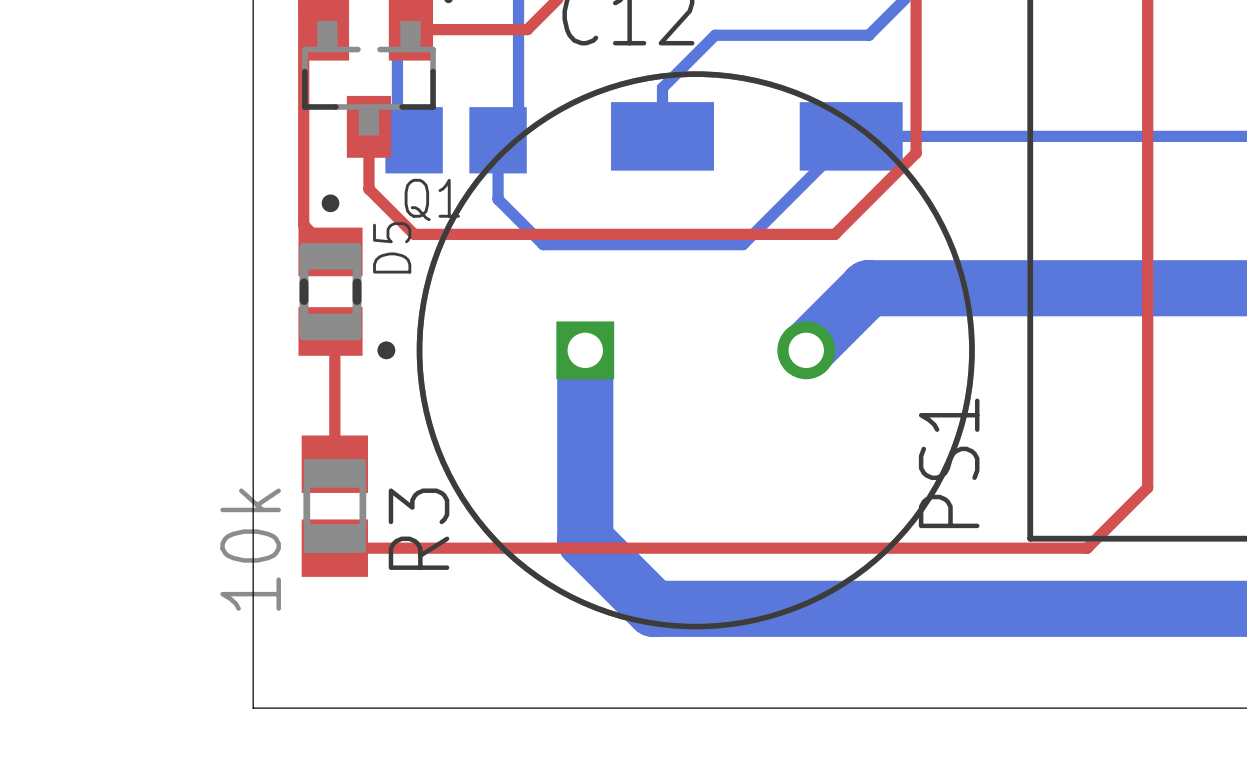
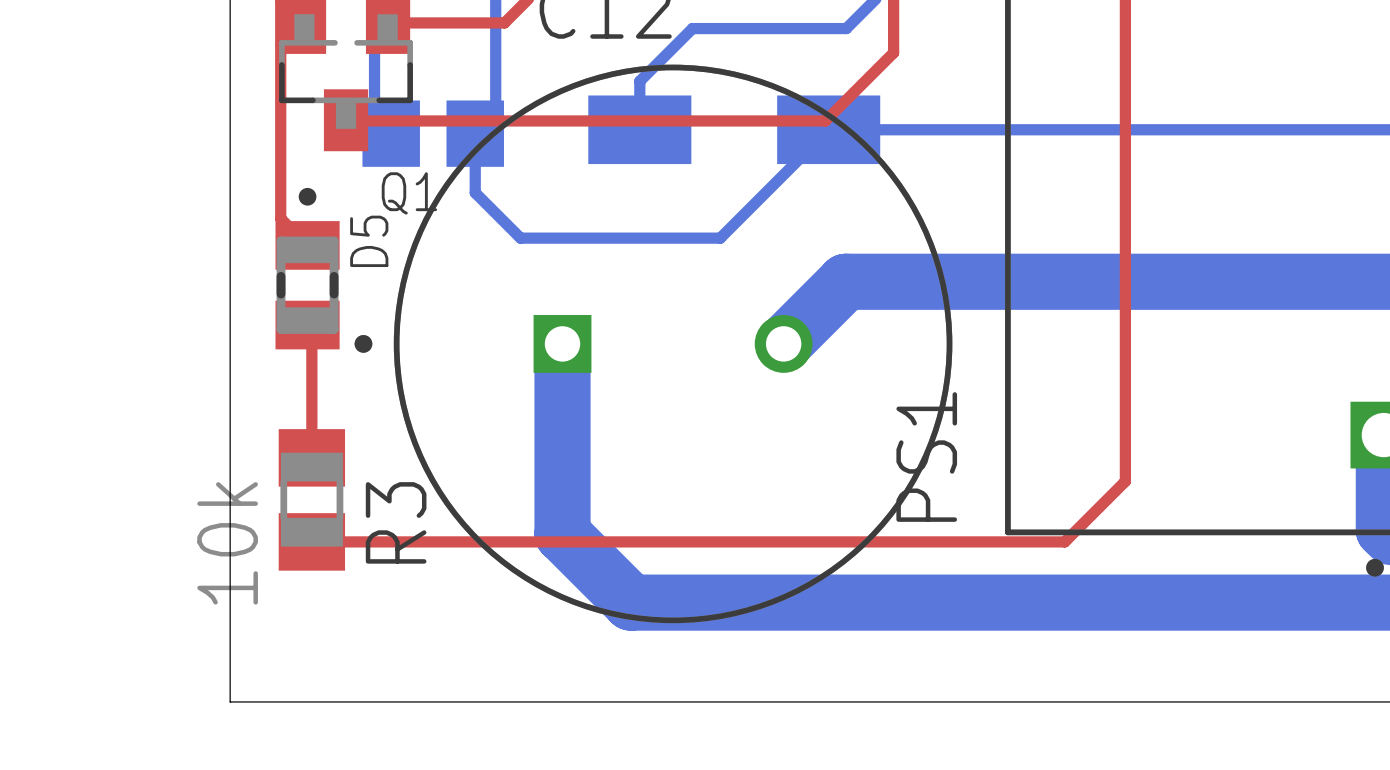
top track: (916, 59) (916, 153) (834, 234) (414, 234) (368, 189) (368, 127) -> (893, 52) (825, 120) (346, 120)

